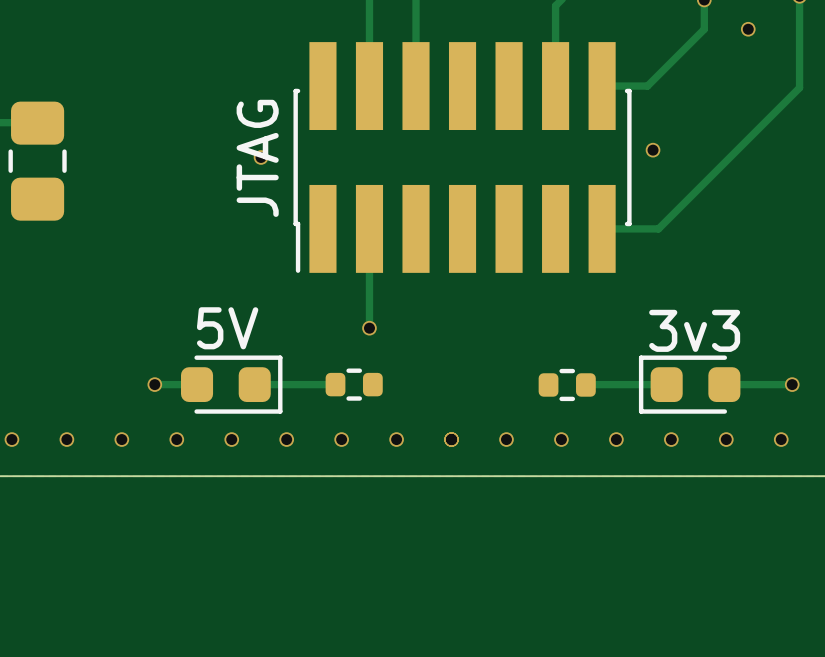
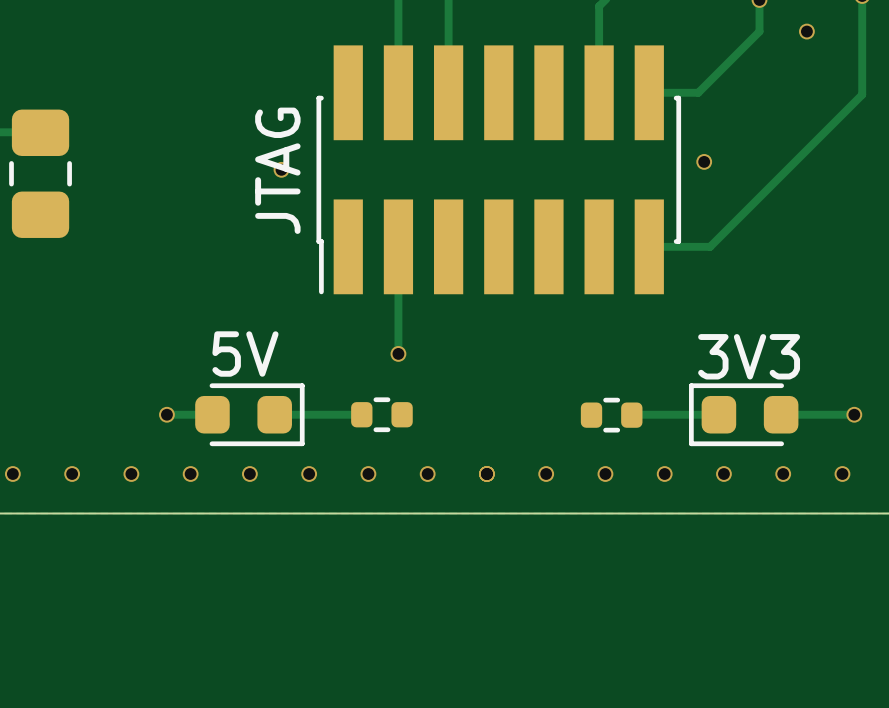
3v3 name: 3v3 (694, 330) -> 3V3 (749, 356)

